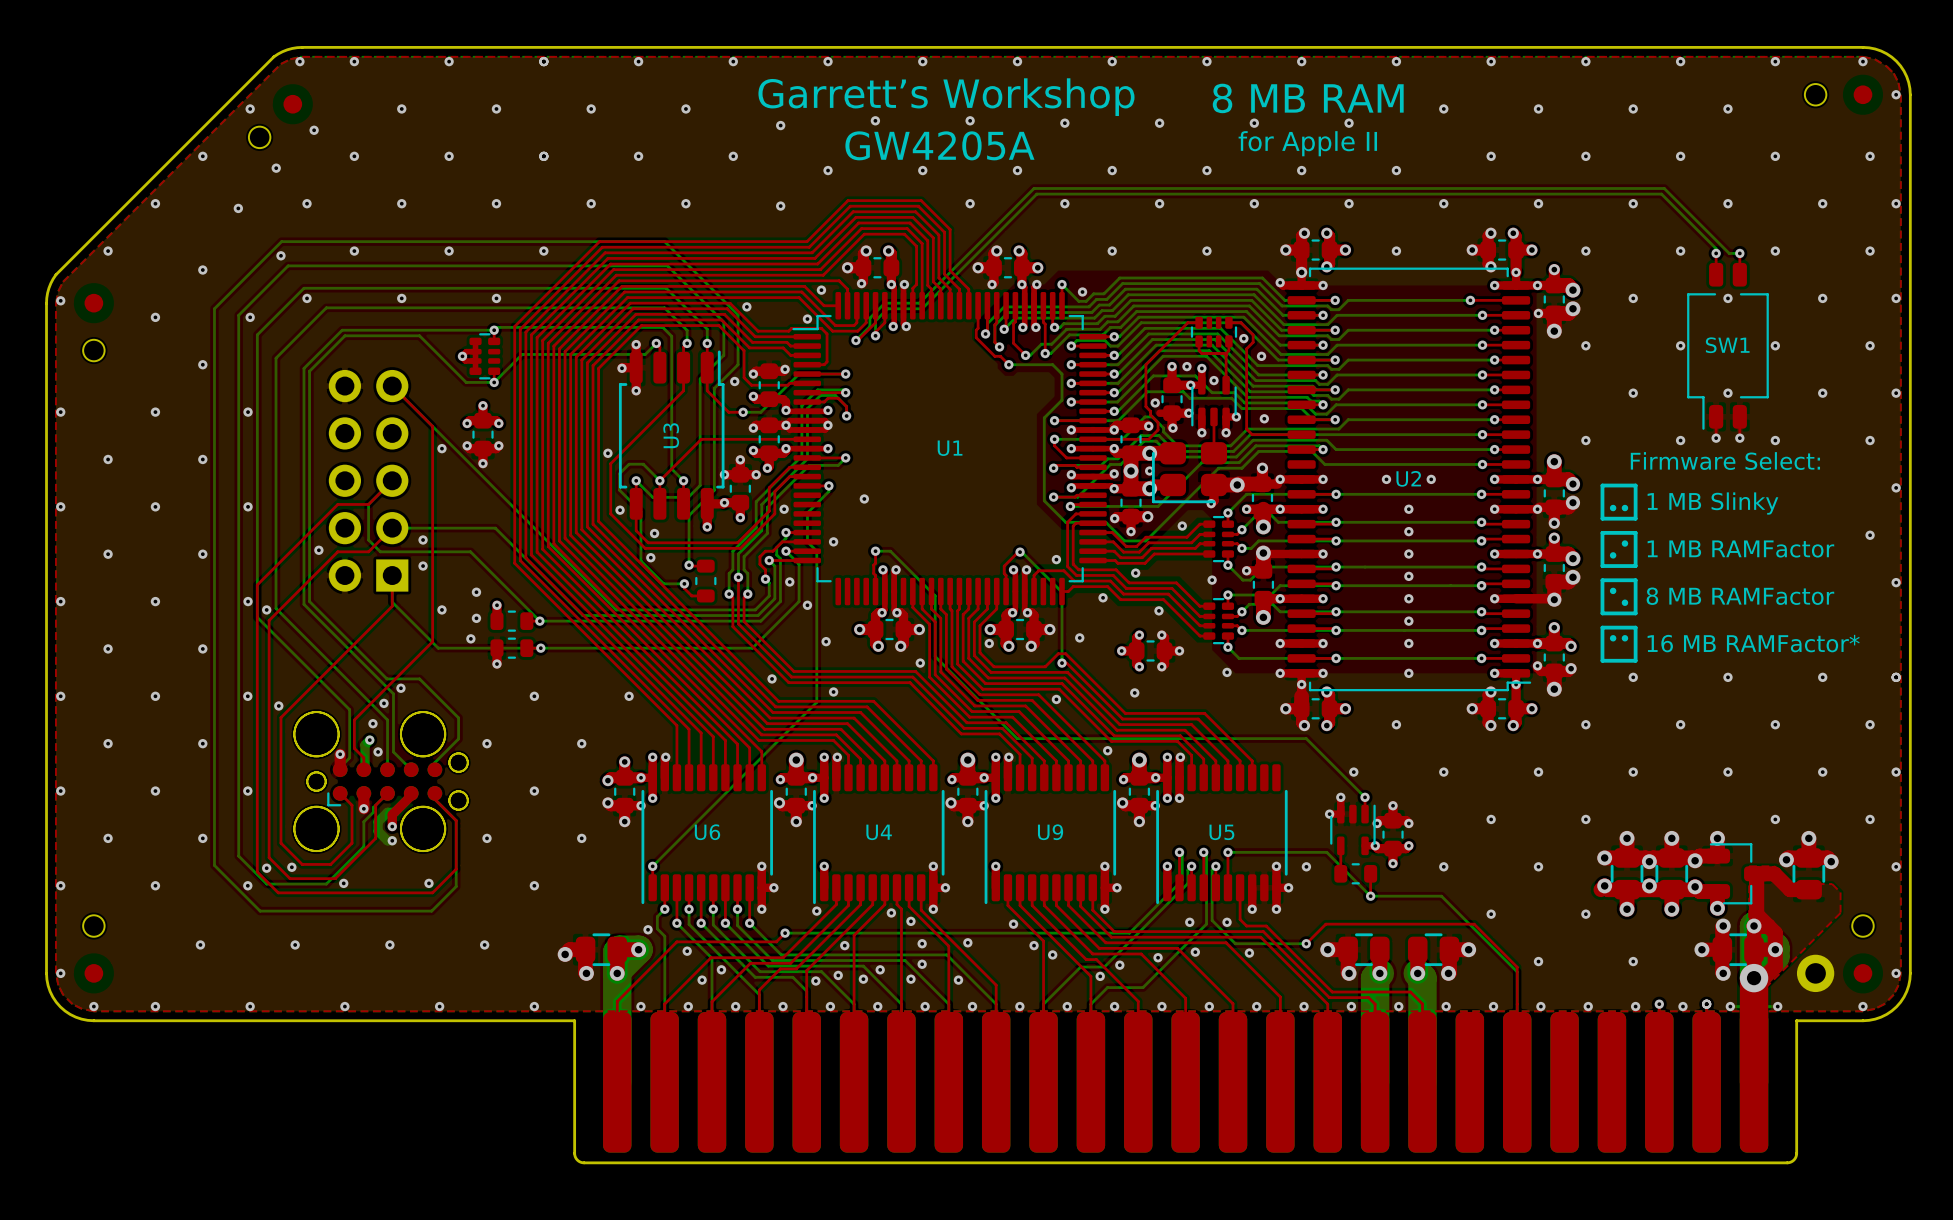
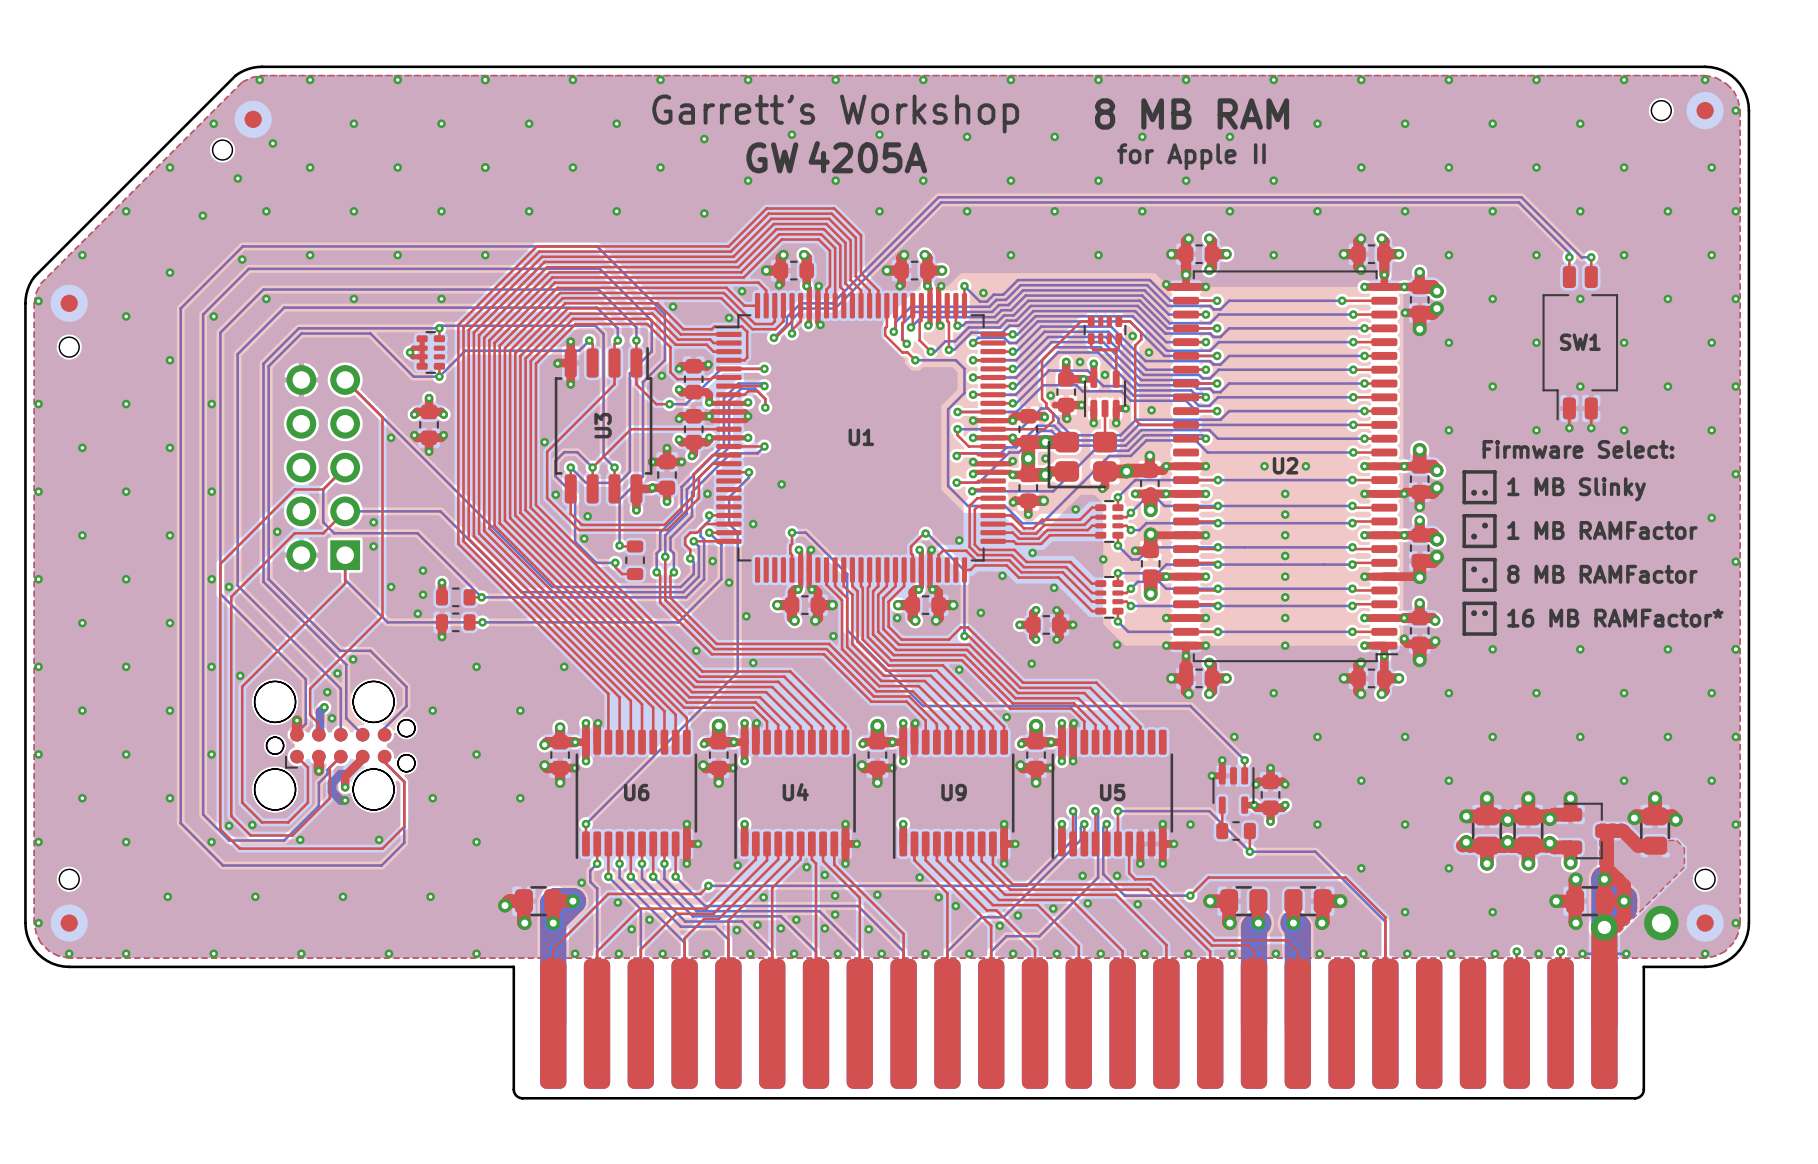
text position: Garrett’s Workshop (946, 97) -> Garrett’s Workshop (835, 114)
text position: GW (877, 145) -> GW (772, 157)
text position: 4205A (973, 145) -> 4205A (867, 157)

